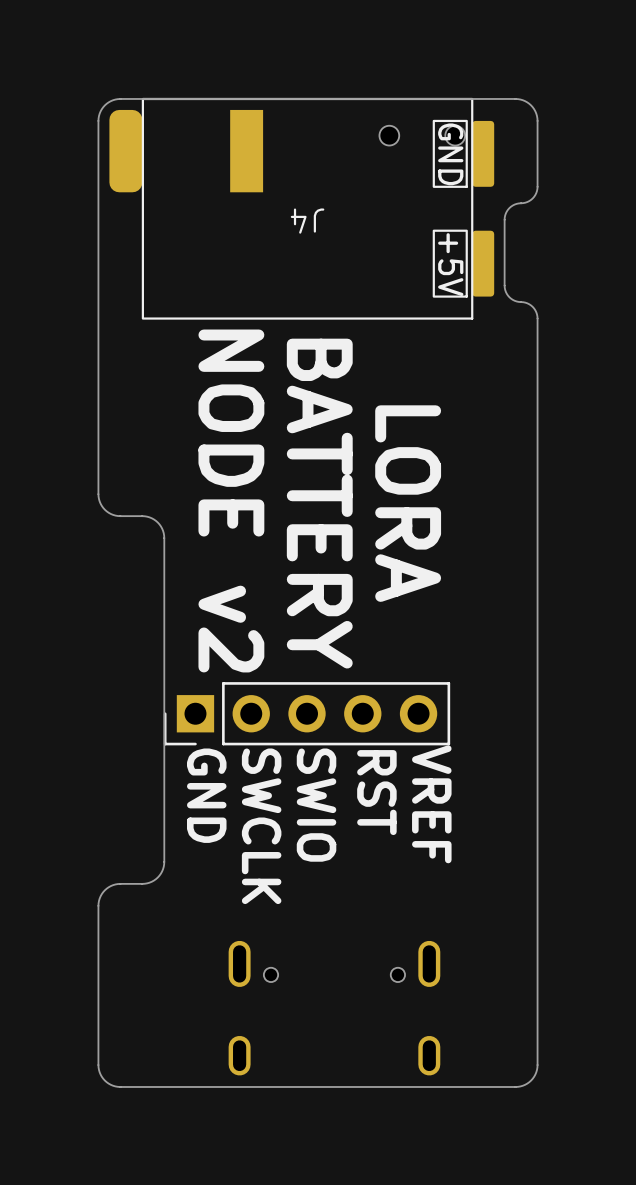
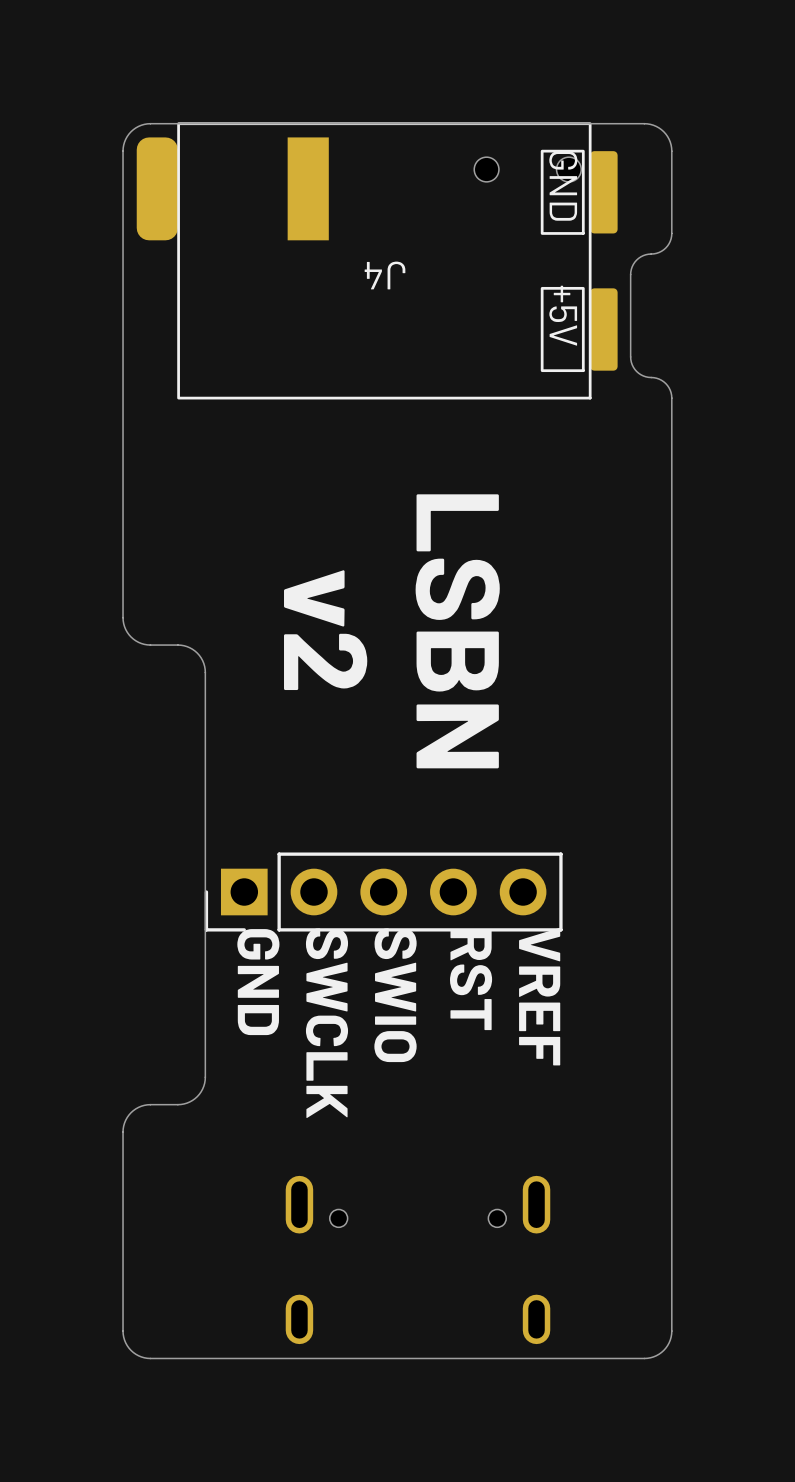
text: NODE v2 (231, 500) -> none
text: none -> v2 (325, 630)
text: BATTERY (319, 503) -> none
text: LORA (408, 503) -> none
text: none -> LSBN (457, 631)

